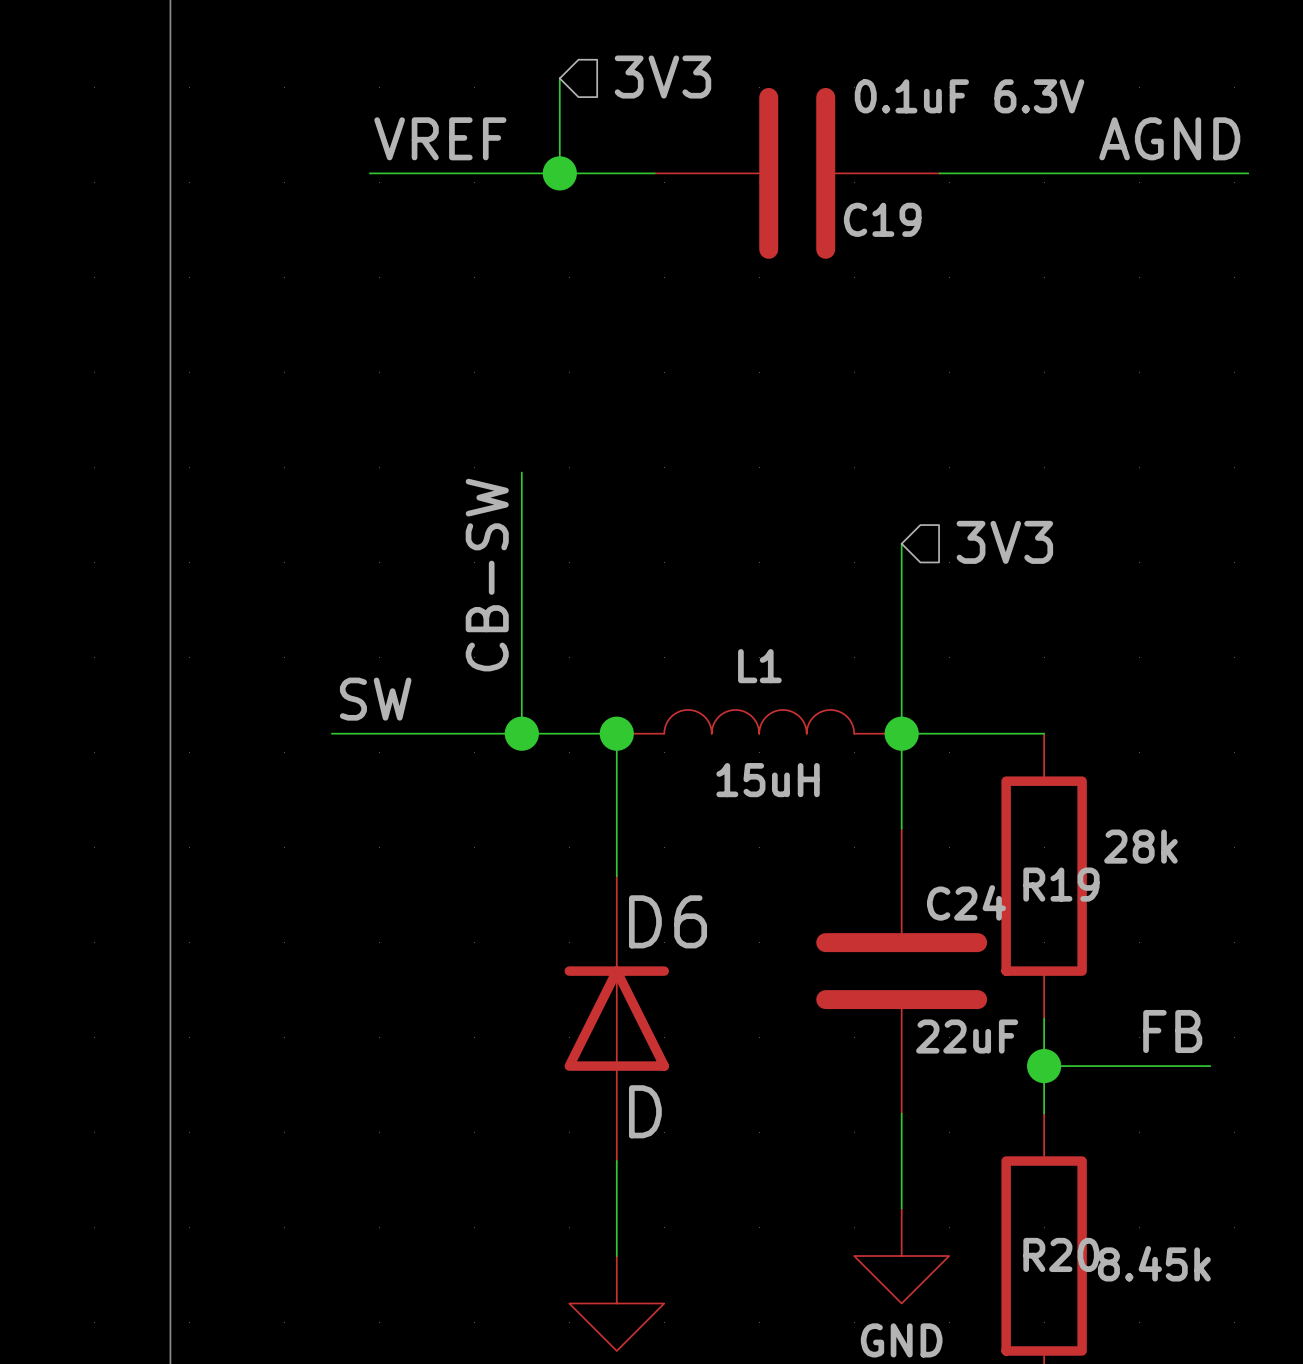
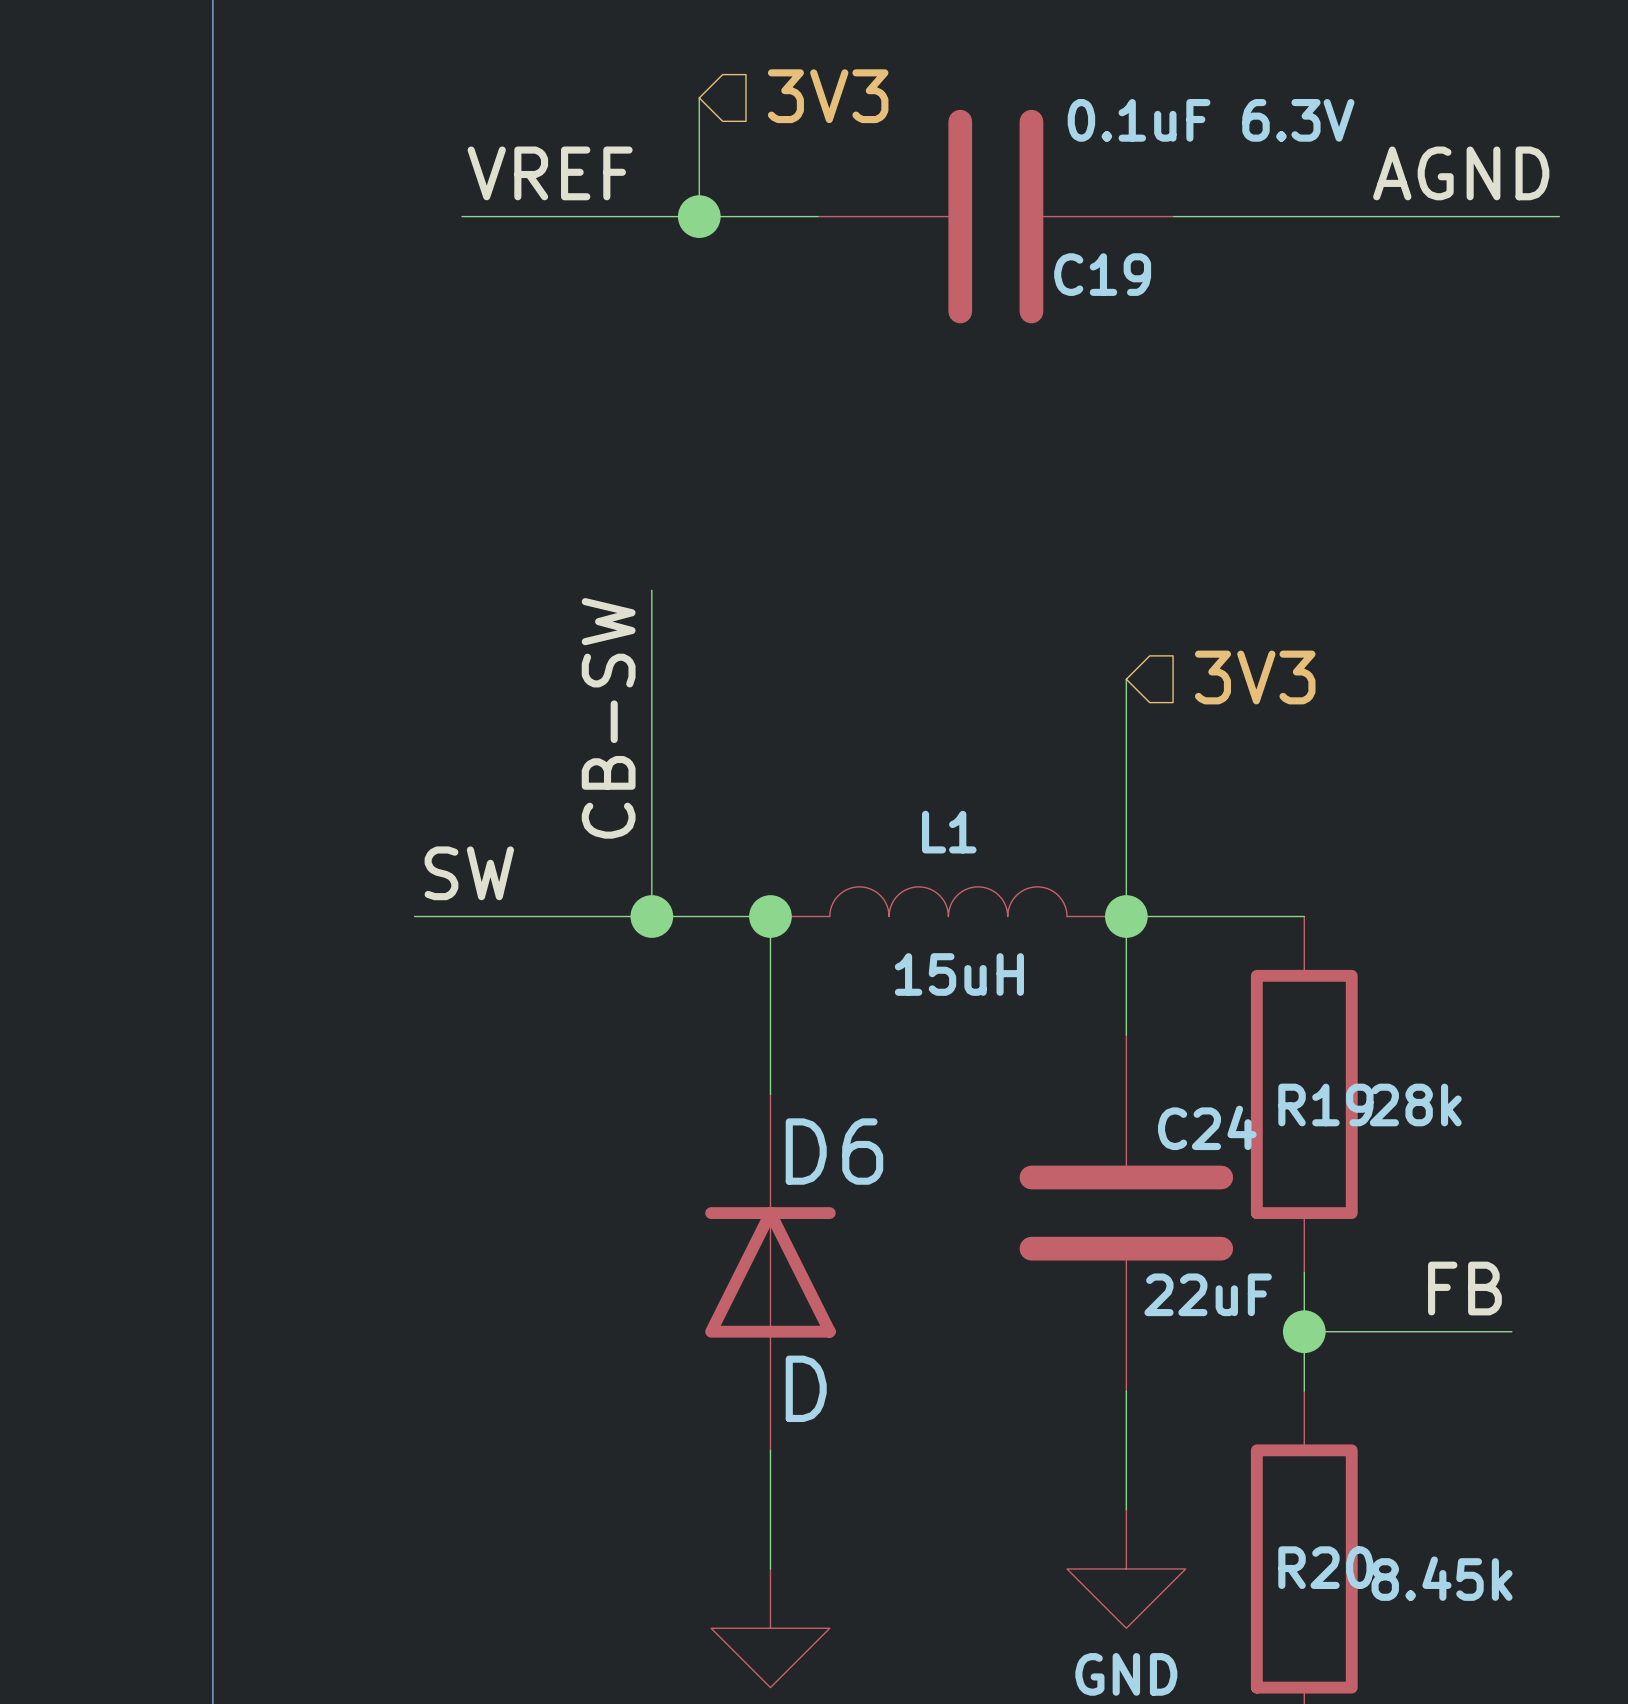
R19 value position: 28k (1140, 846) -> 28k (1415, 1104)

